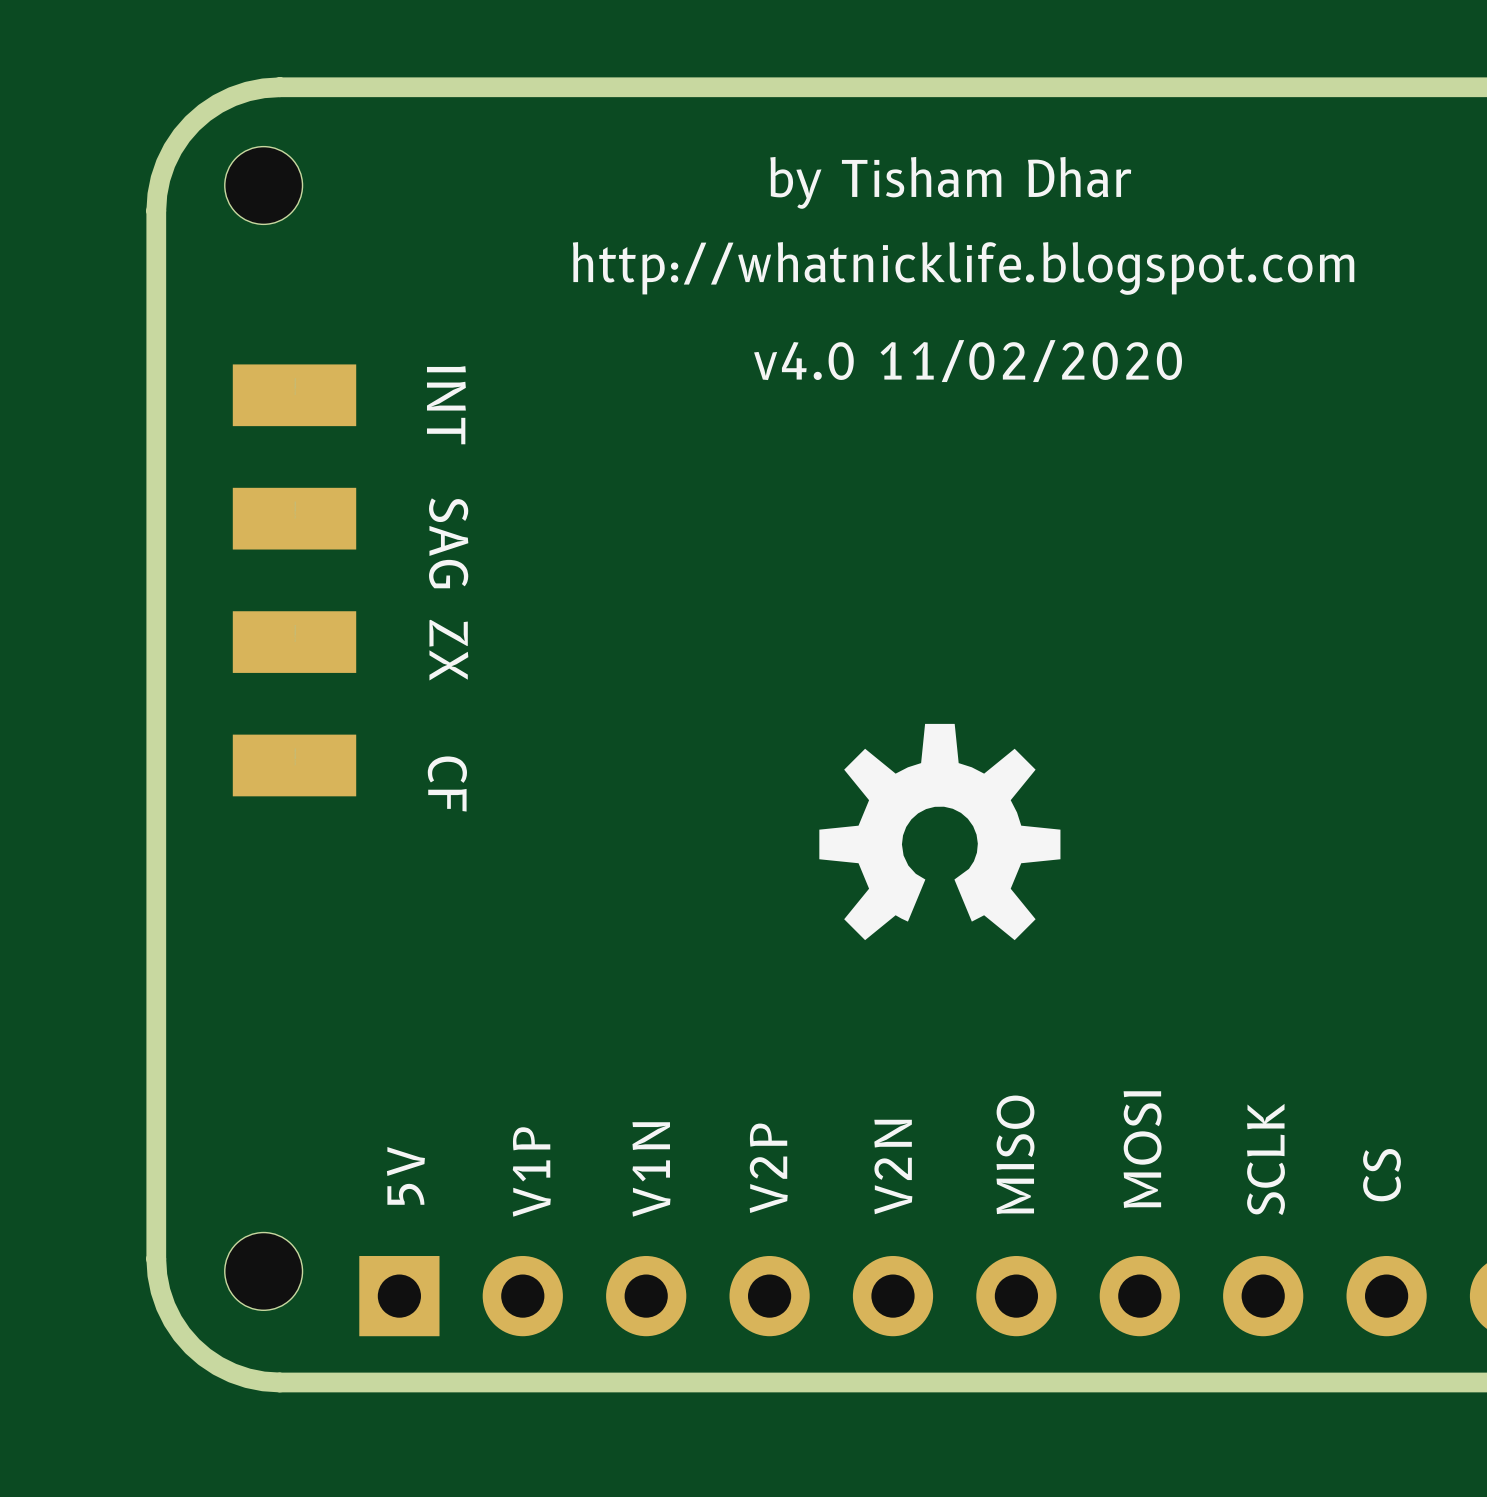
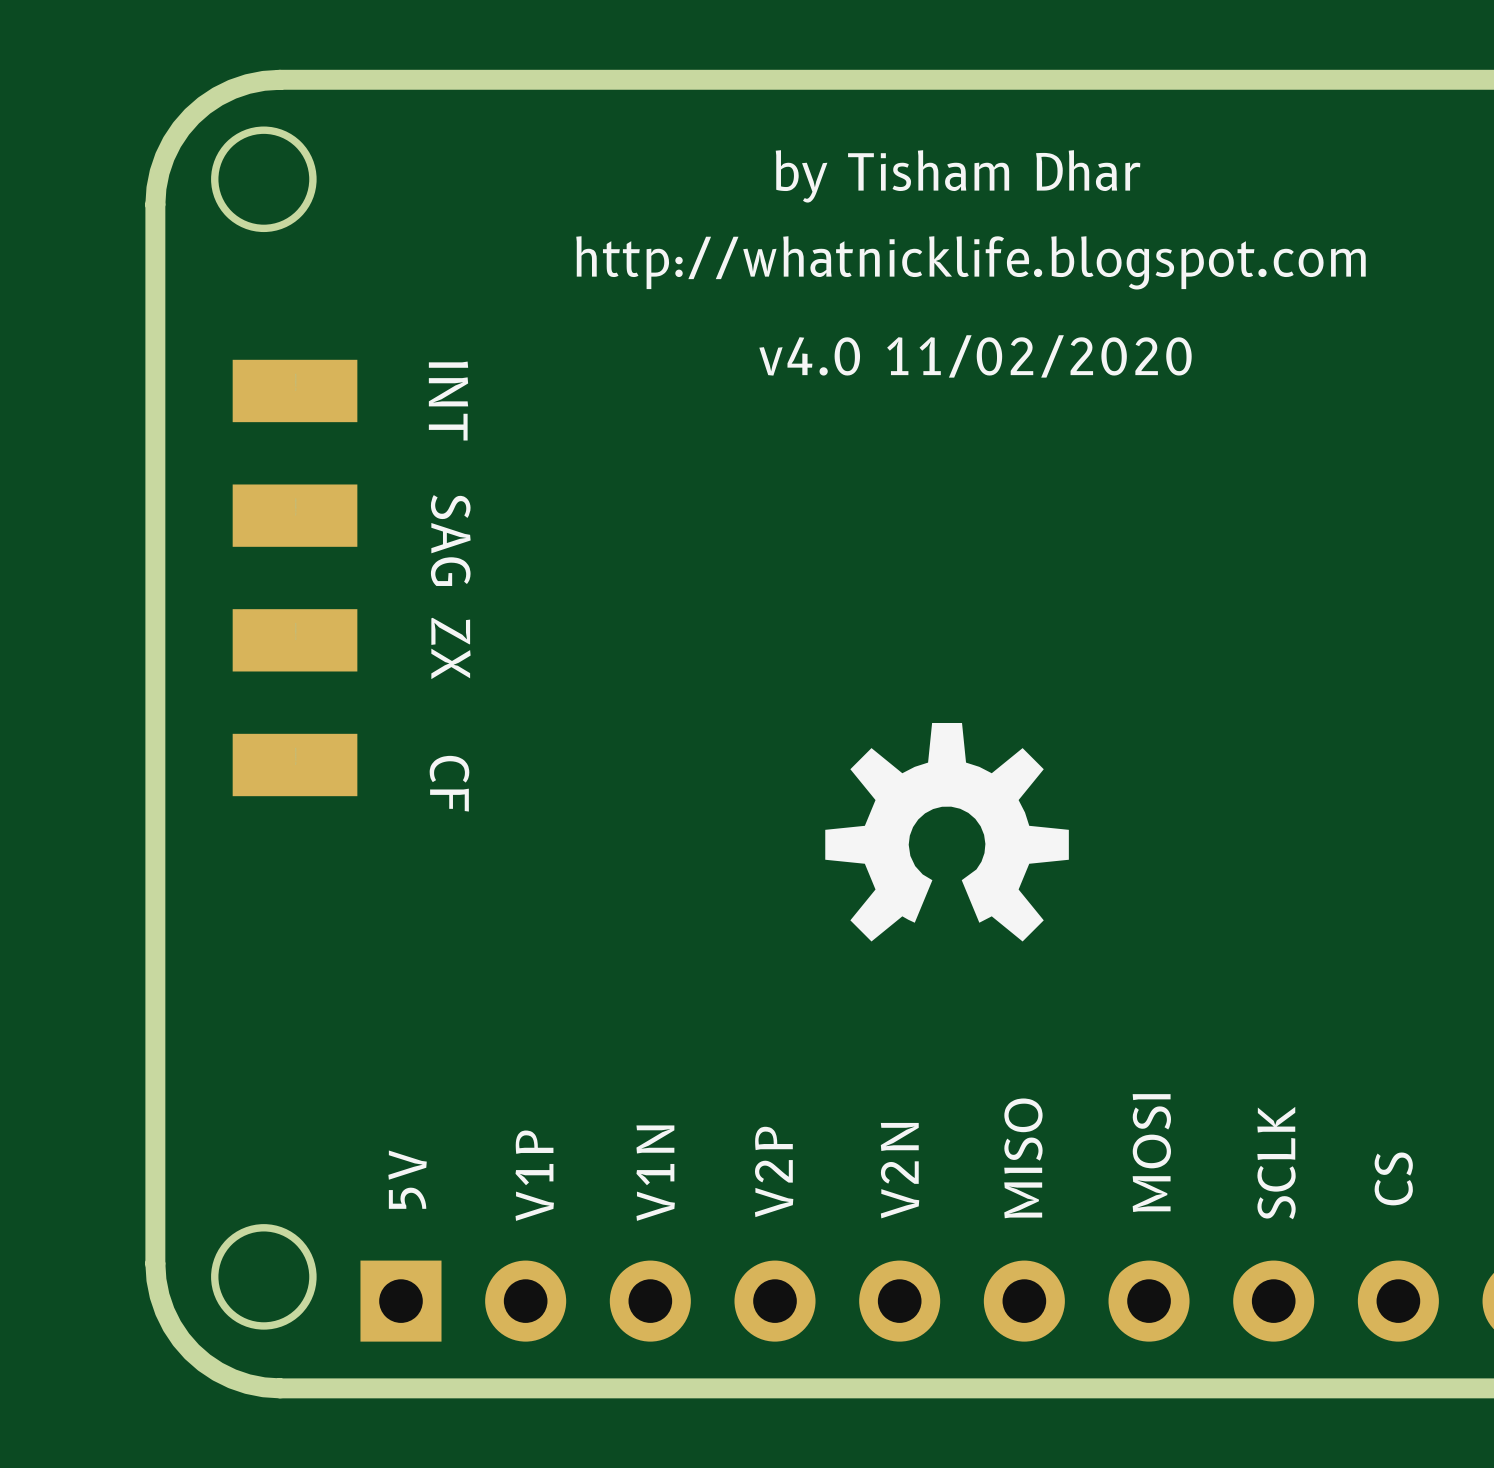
round board edge: none -> [211, 126, 317, 233]
part: (263, 185) -> none
round board edge: none -> [211, 1224, 317, 1330]
part: (263, 1271) -> none

